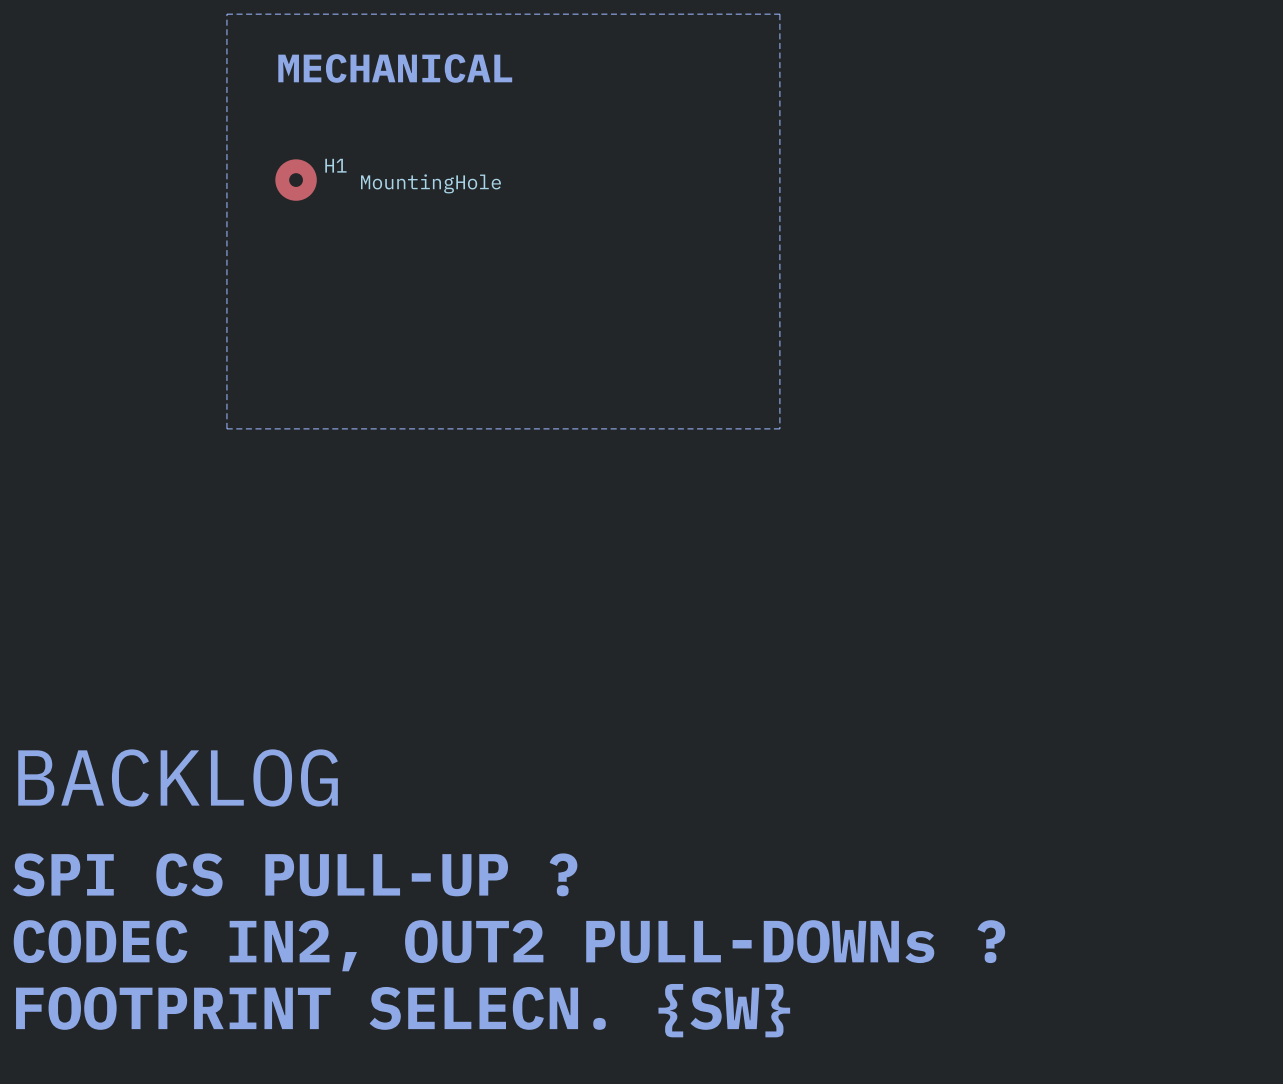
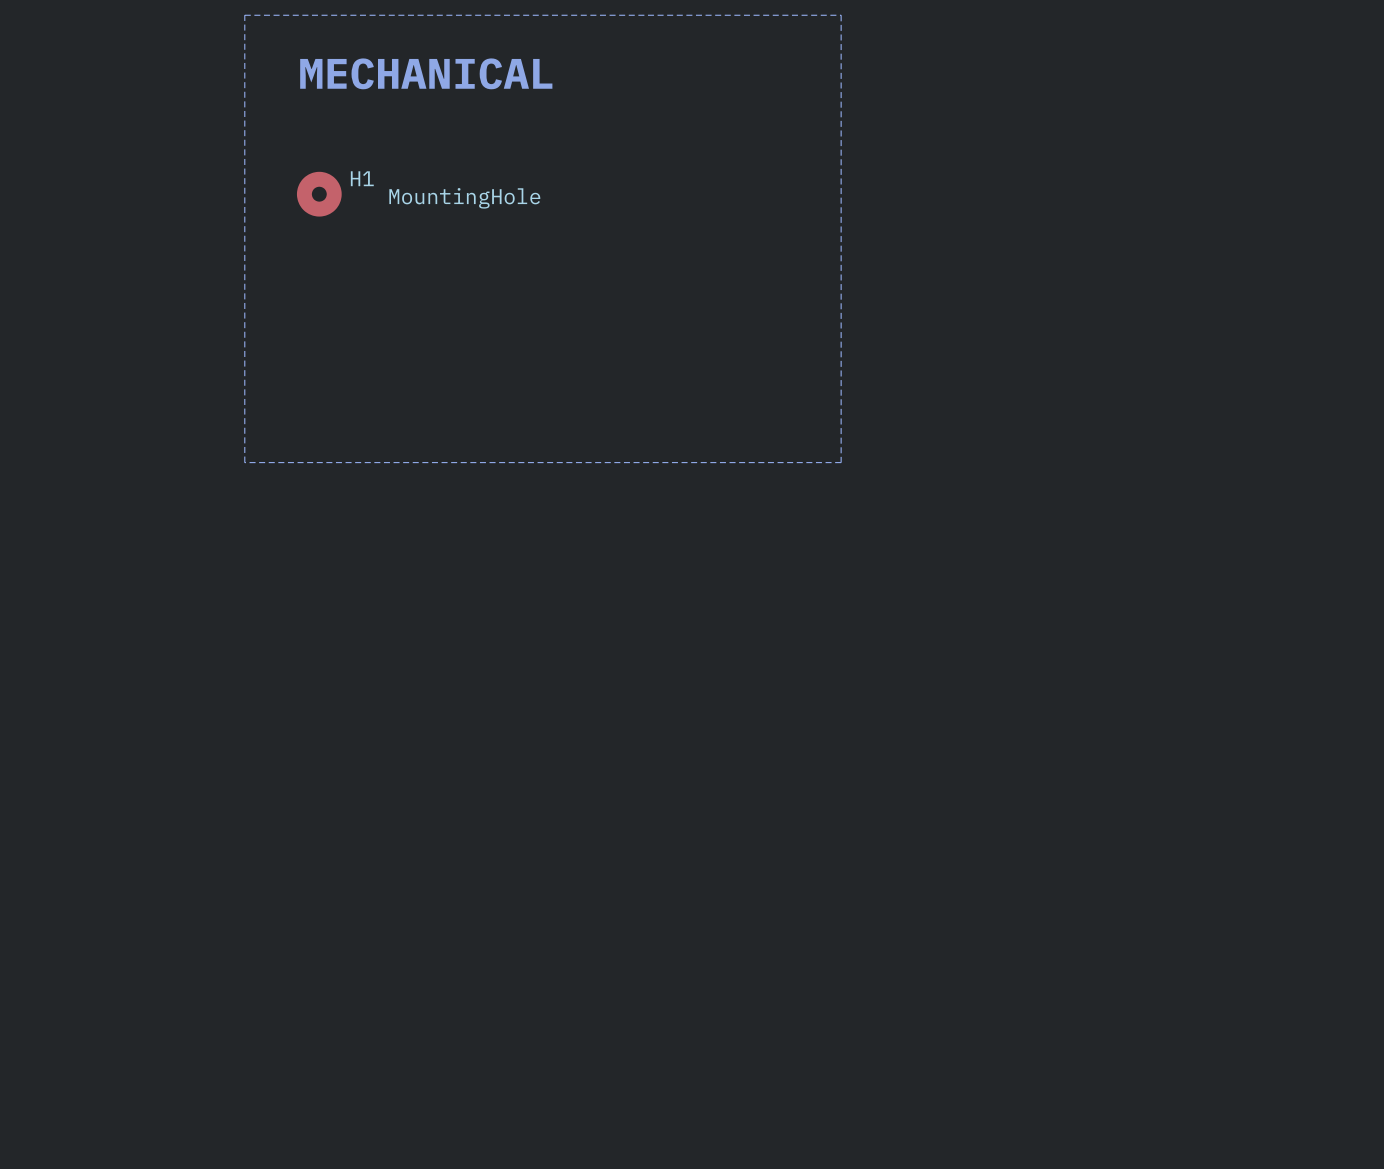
text: BACKLOG (178, 777) -> none
text: SPI CS PULL-UP ? (295, 874) -> none
text: CODEC IN2, OUT2 PULL-DOWNs ? (509, 945) -> none
text: FOOTPRINT SELECN. {SW} (403, 1010) -> none

